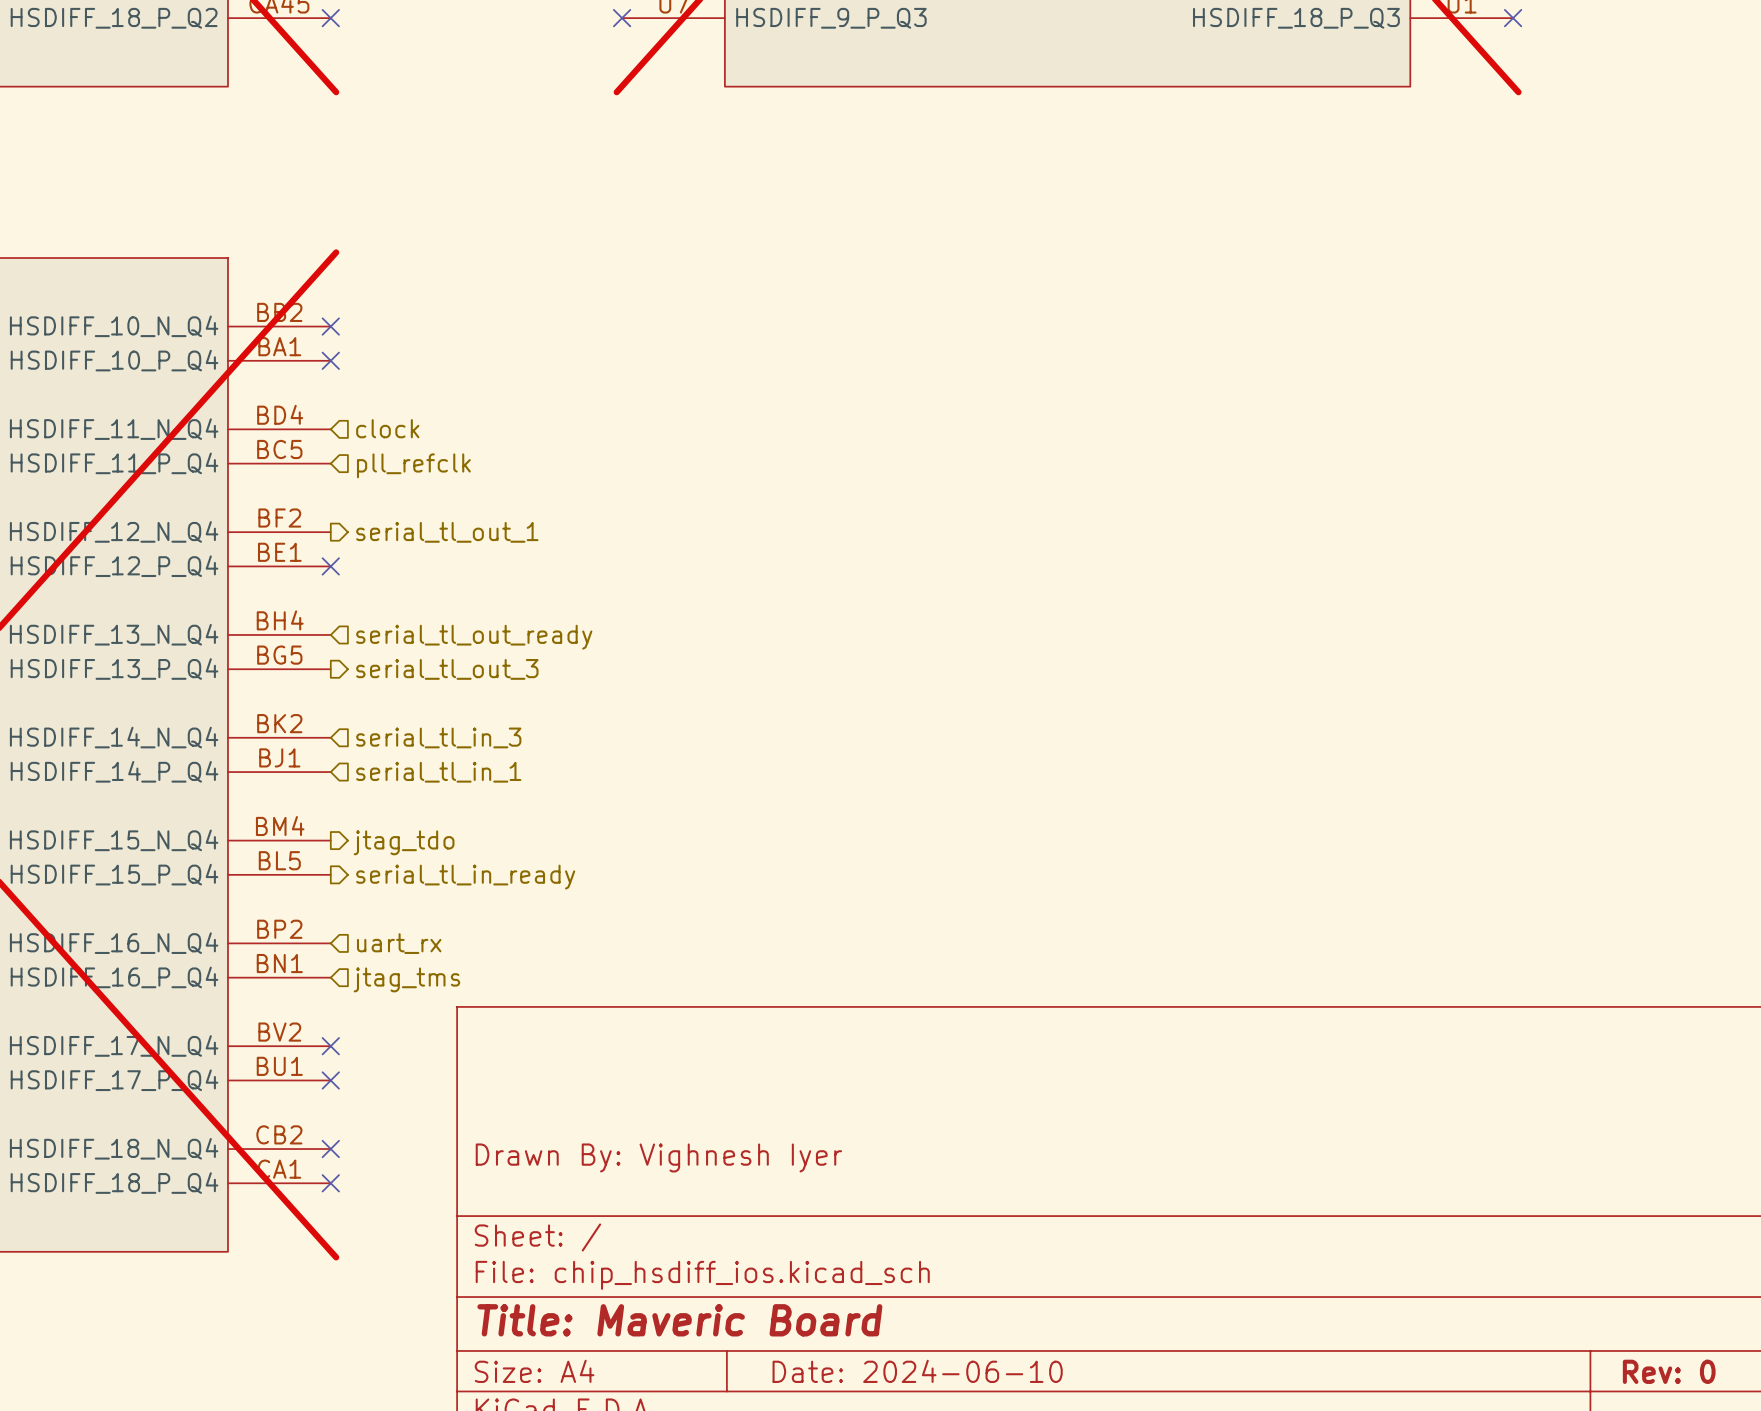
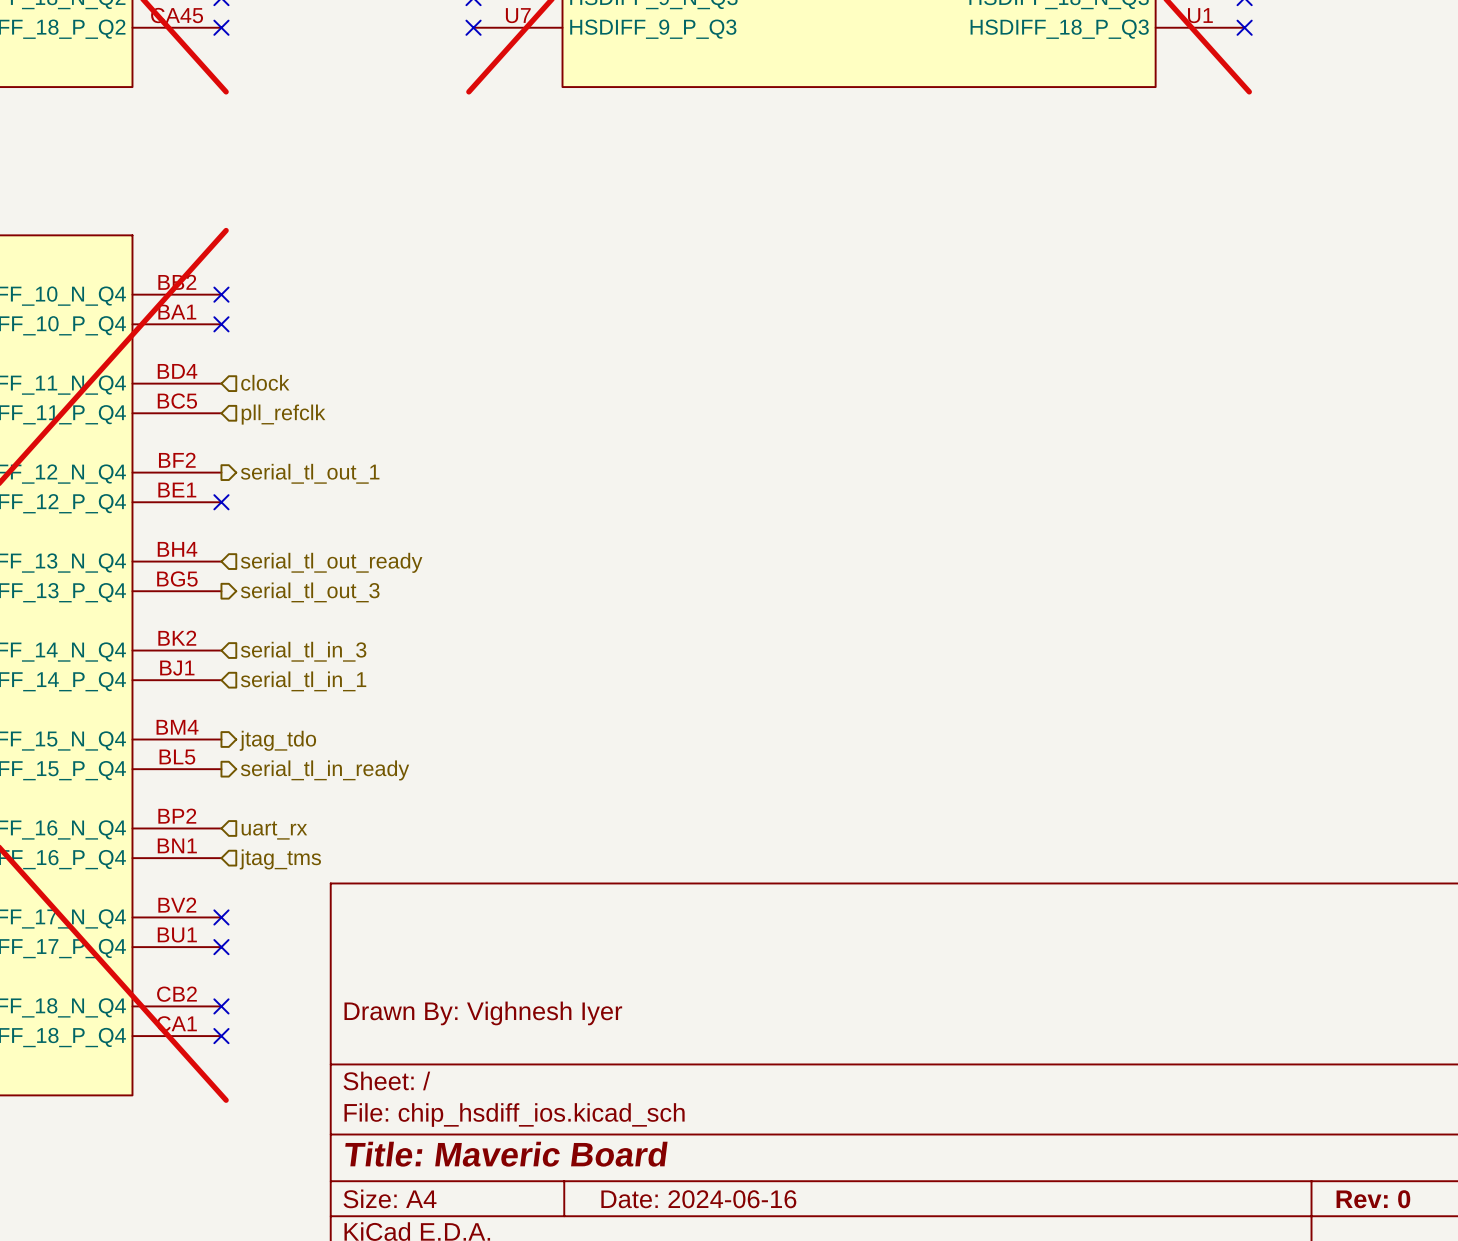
title block: Date: 2024-06-10 (917, 1371) -> Date: 2024-06-16 (698, 1199)

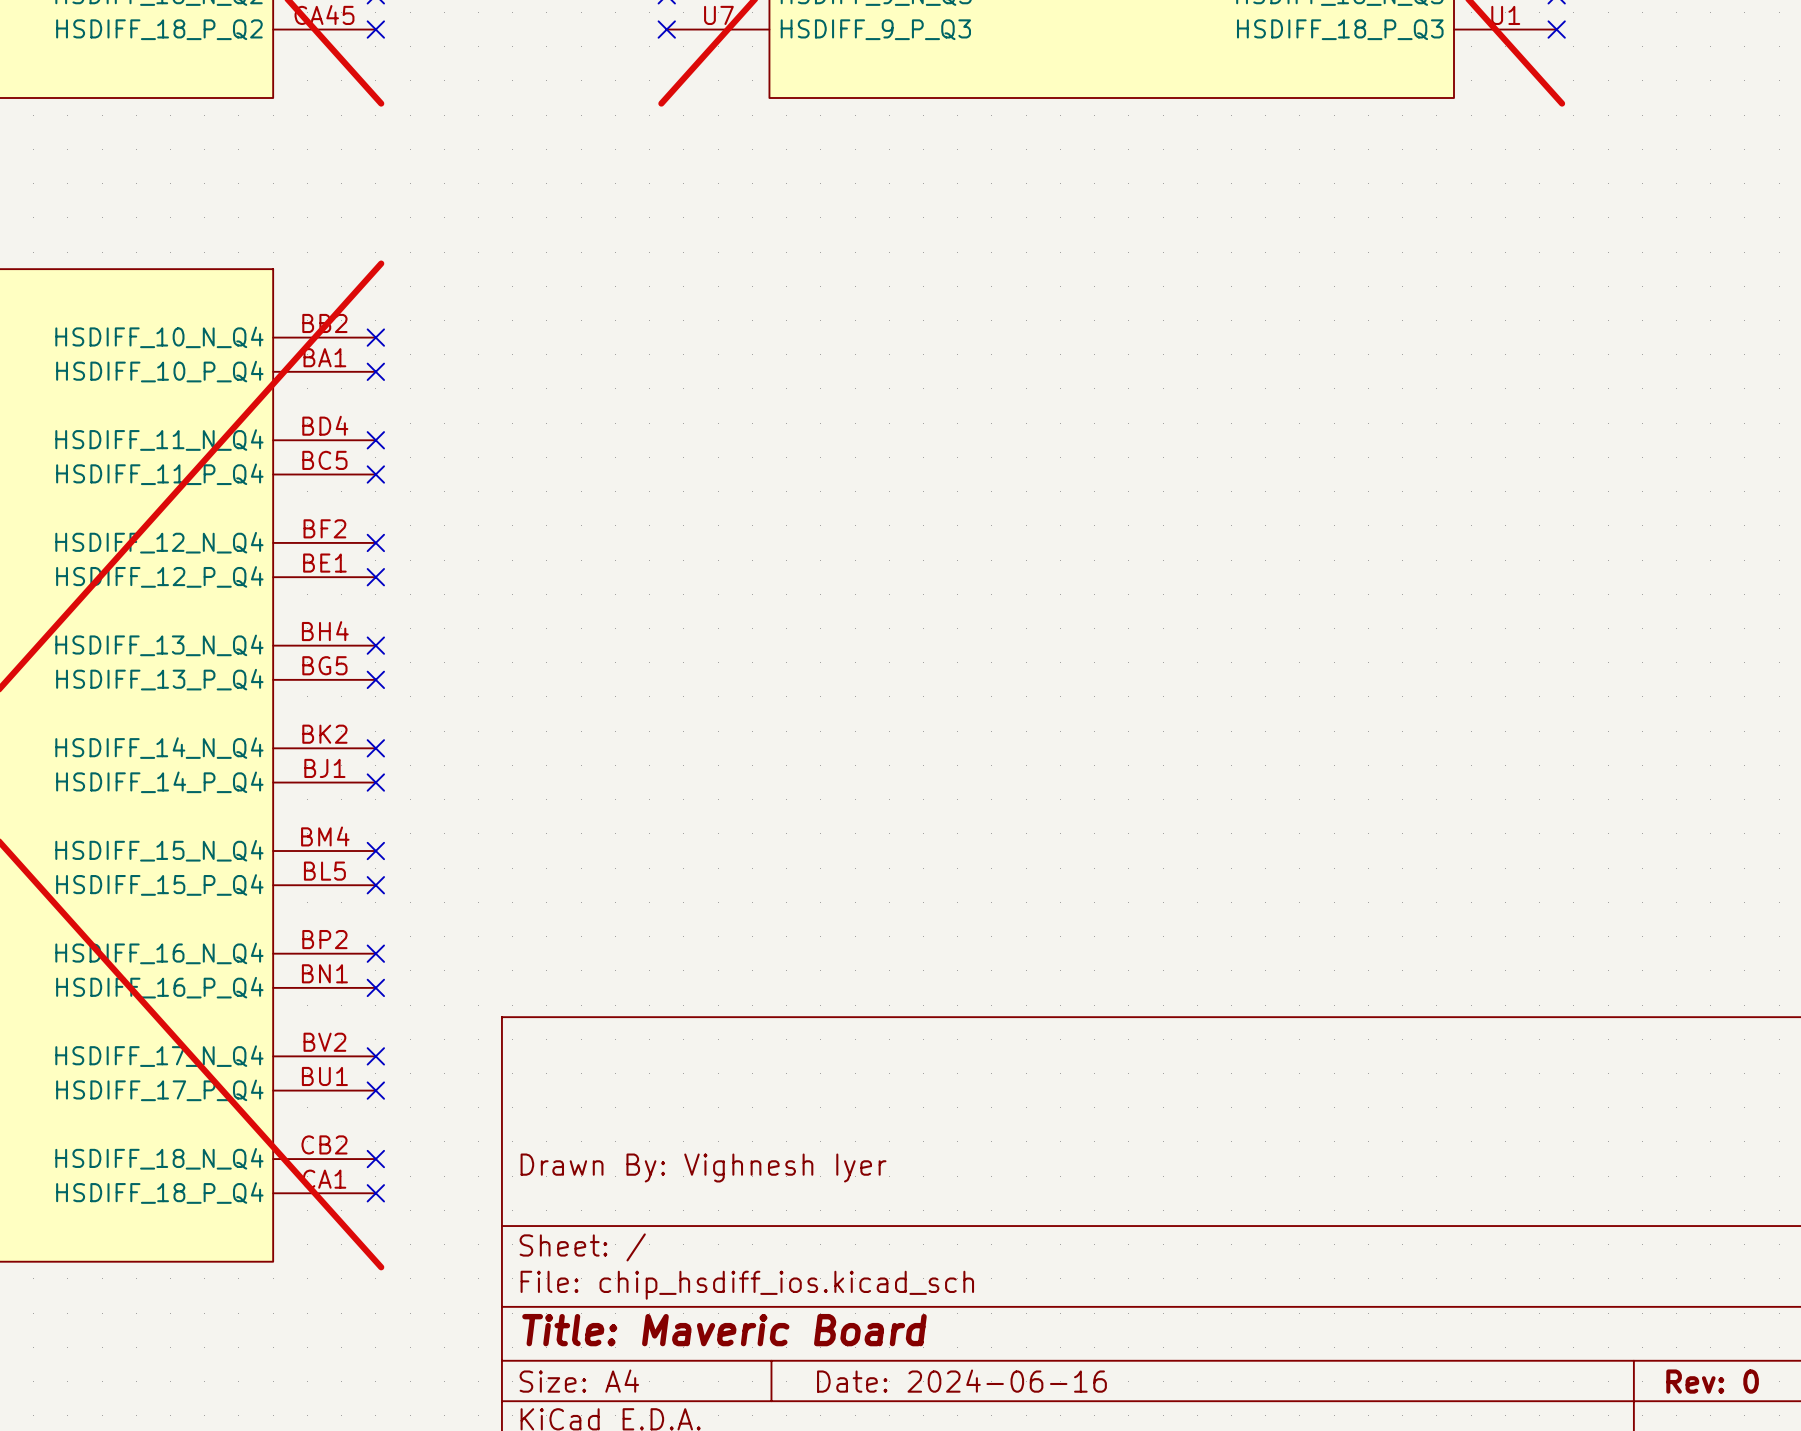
hierarchical label: clock (265, 382) -> none
no-connect mark: none -> (375, 440)
no-connect mark: none -> (375, 474)
hierarchical label: pll_refclk (283, 414) -> none
no-connect mark: none -> (375, 542)
hierarchical label: serial_tl_out_1 (310, 473) -> none
no-connect mark: none -> (375, 645)
hierarchical label: serial_tl_out_ready (331, 562) -> none
no-connect mark: none -> (375, 679)
hierarchical label: serial_tl_out_3 (310, 592) -> none
no-connect mark: none -> (375, 748)
hierarchical label: serial_tl_in_3 (303, 651) -> none
no-connect mark: none -> (375, 782)
hierarchical label: serial_tl_in_1 (303, 681) -> none
no-connect mark: none -> (375, 851)
hierarchical label: jtag_tdo (277, 740) -> none
no-connect mark: none -> (375, 885)
hierarchical label: serial_tl_in_ready (325, 770) -> none
no-connect mark: none -> (375, 953)
hierarchical label: uart_rx (274, 830) -> none
no-connect mark: none -> (375, 987)
hierarchical label: jtag_tms (280, 859) -> none

